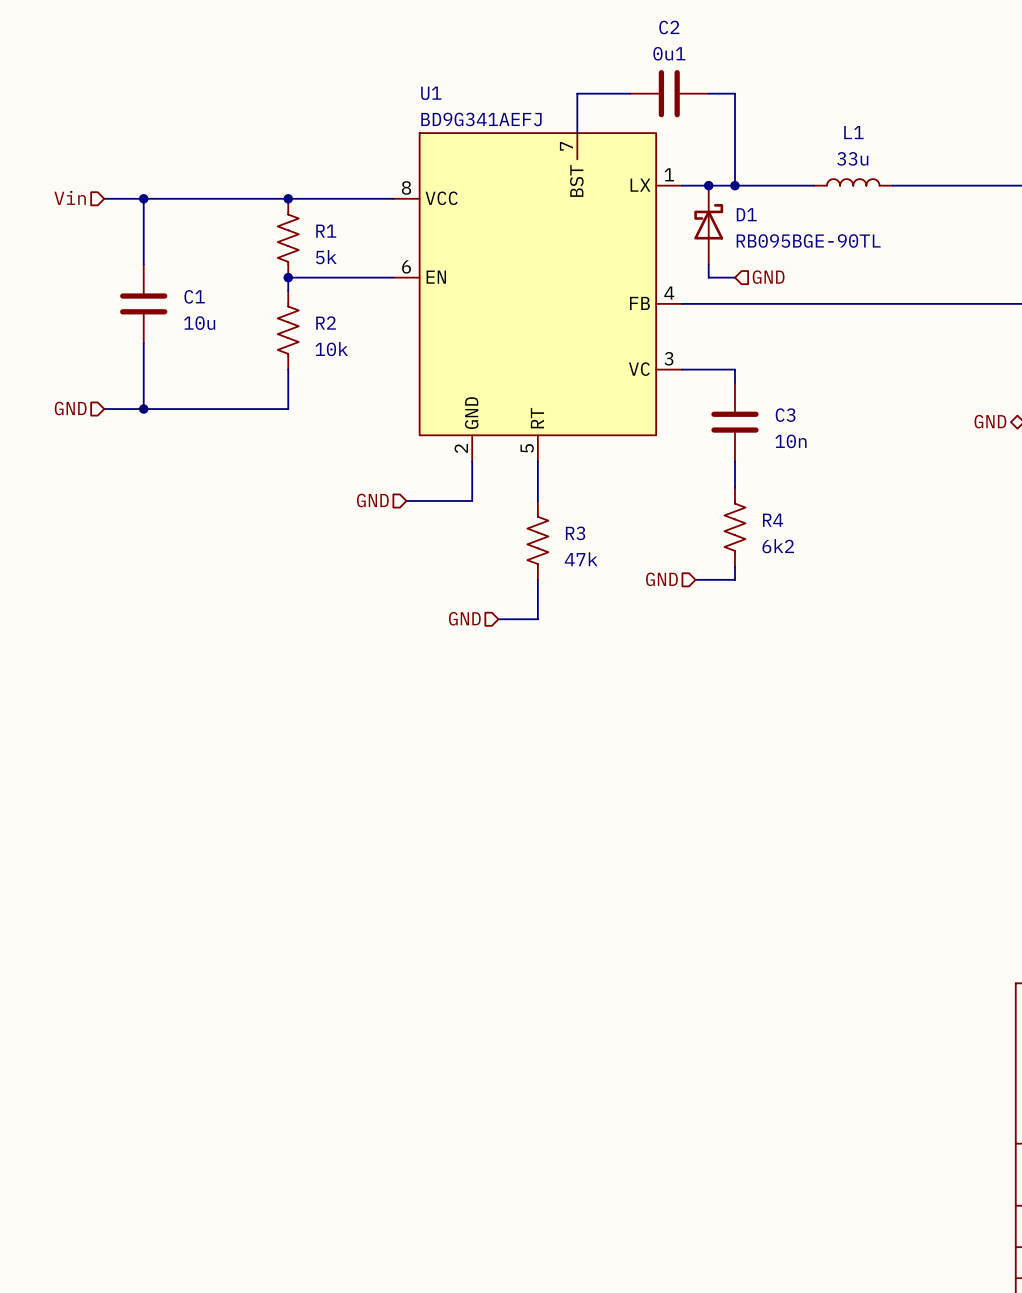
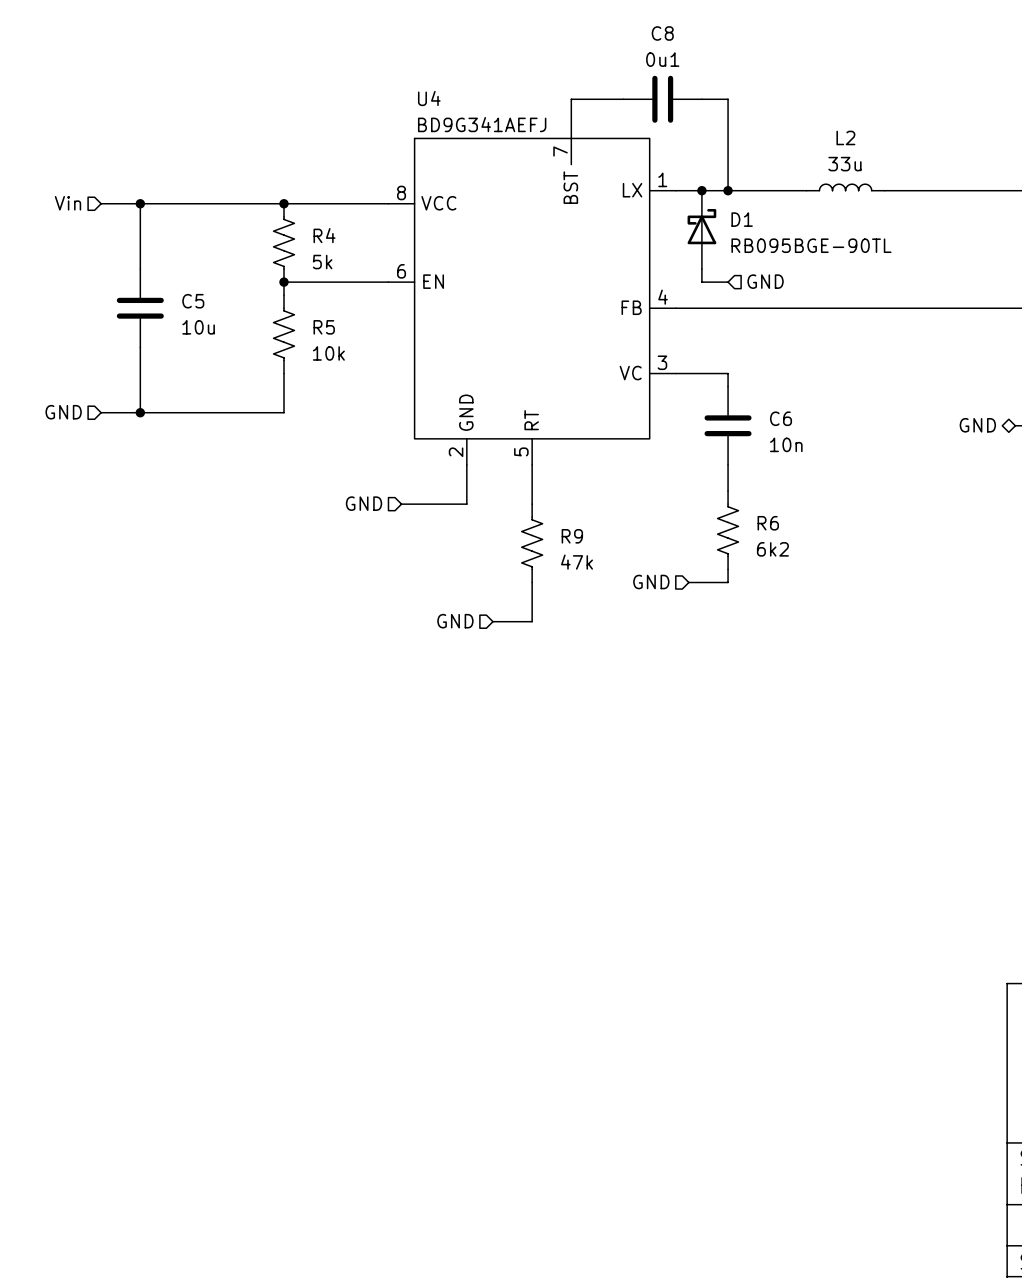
C2 name: C2 (669, 27) -> C8 (662, 33)
U1 name: U1 (431, 93) -> U4 (429, 98)
L1 name: L1 (853, 132) -> L2 (845, 137)
R1 name: R1 (326, 231) -> R4 (324, 235)
C1 name: C1 (194, 296) -> C5 (193, 301)
R2 name: R2 (326, 323) -> R5 (324, 327)
C3 name: C3 (785, 415) -> C6 (781, 418)
R4 name: R4 (773, 520) -> R6 (768, 523)
R3 name: R3 (575, 533) -> R9 (572, 536)

